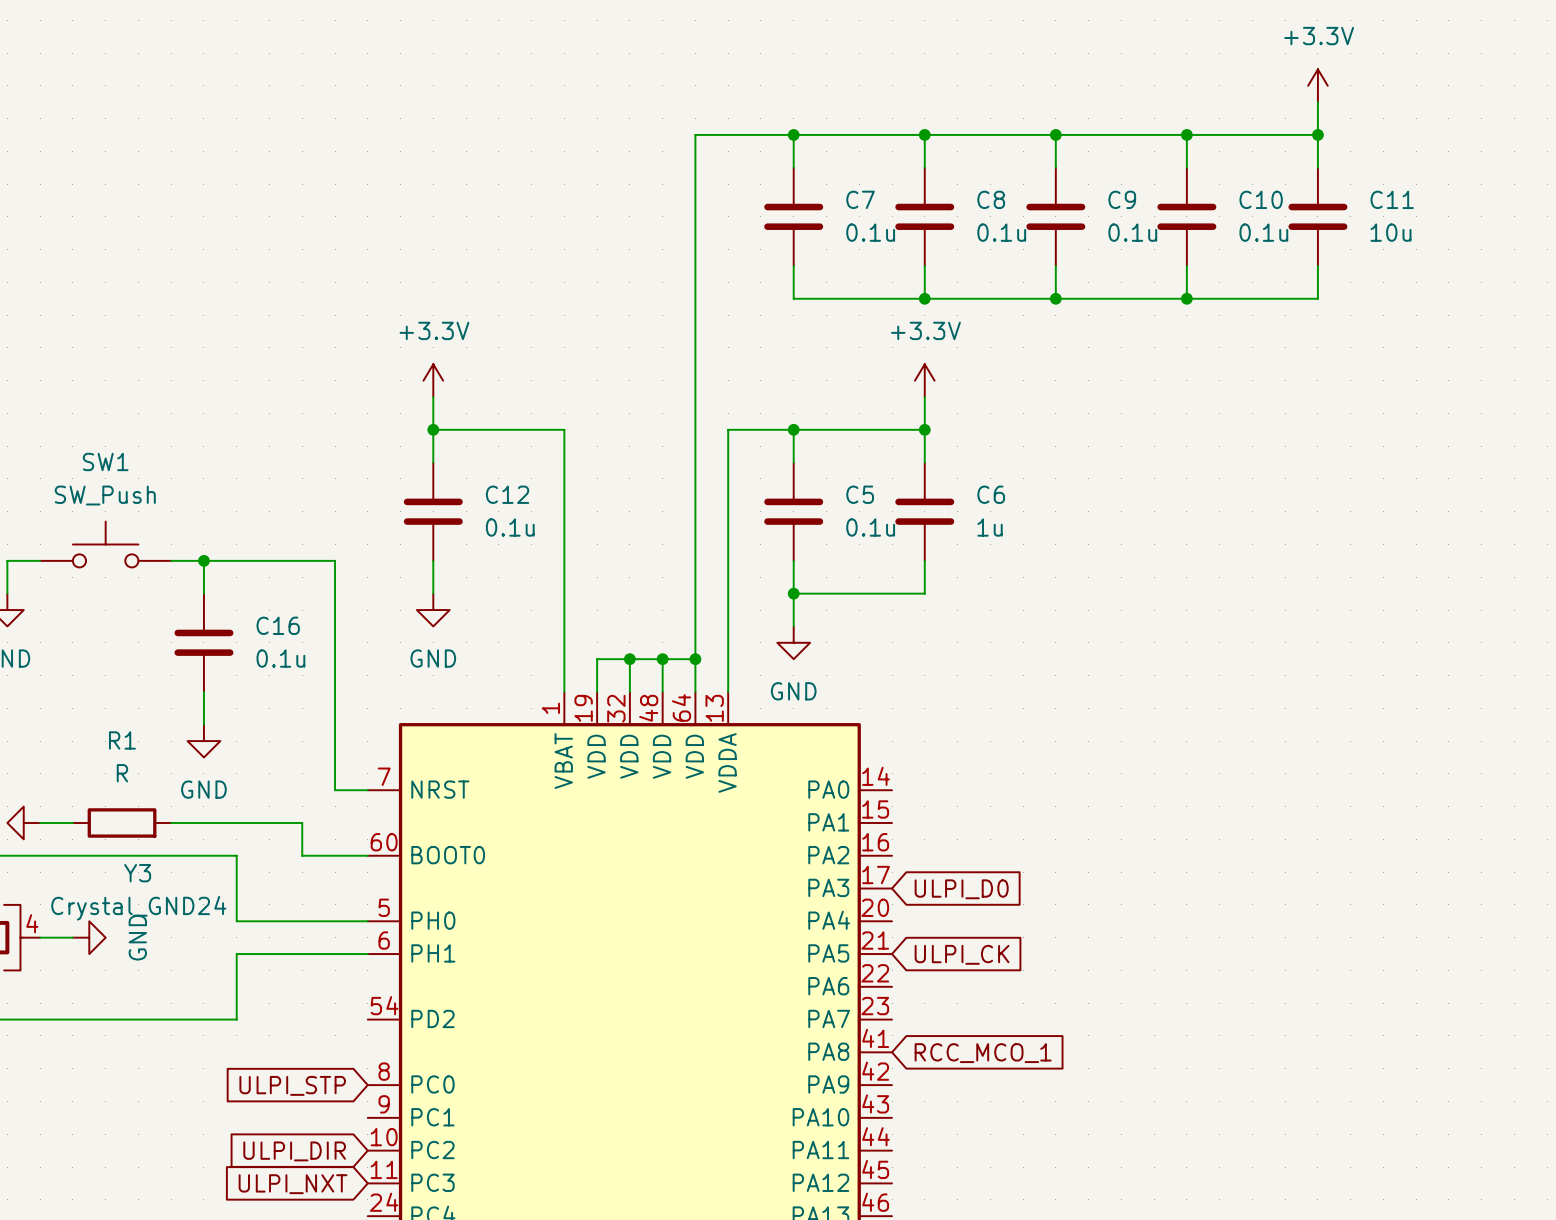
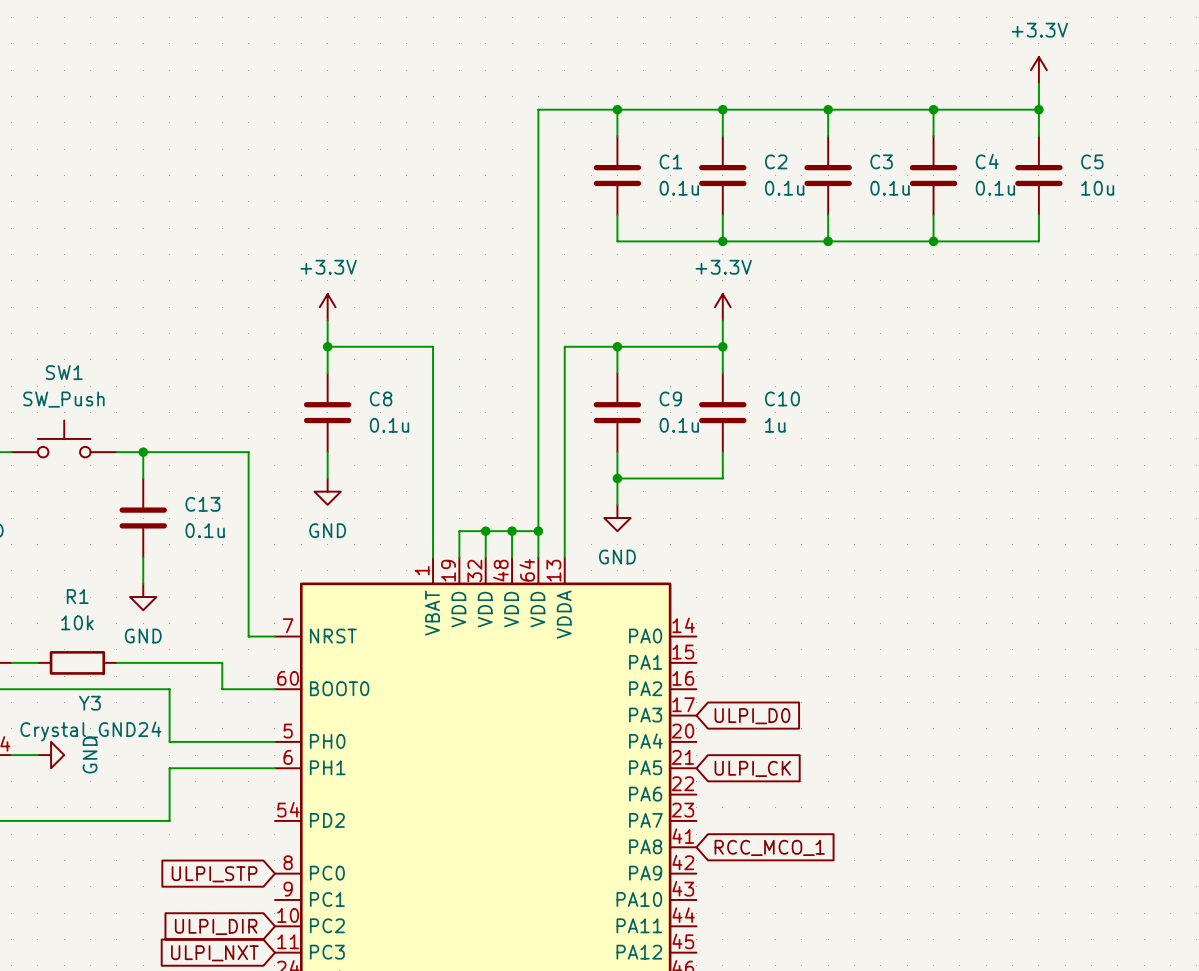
C7 name: C7 (860, 199) -> C1 (670, 161)
C8 name: C8 (991, 199) -> C2 (776, 161)
C9 name: C9 (1122, 199) -> C3 (881, 161)
C10 name: C10 (1261, 199) -> C4 (987, 161)
C11 name: C11 (1392, 199) -> C5 (1092, 161)
C12 name: C12 (507, 494) -> C8 (381, 398)
C5 name: C5 (860, 494) -> C9 (670, 398)
C6 name: C6 (991, 494) -> C10 (782, 398)
C16 name: C16 (278, 625) -> C13 (202, 504)
R1 value: R (122, 773) -> 10k (77, 622)

